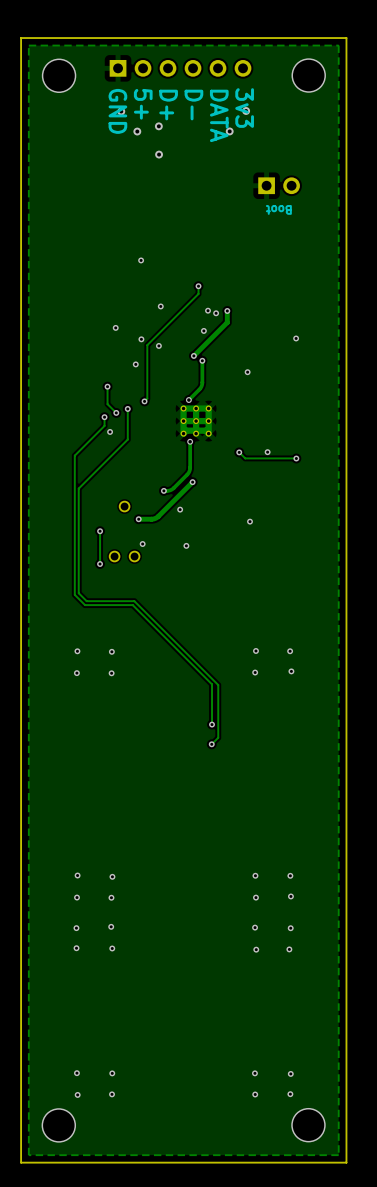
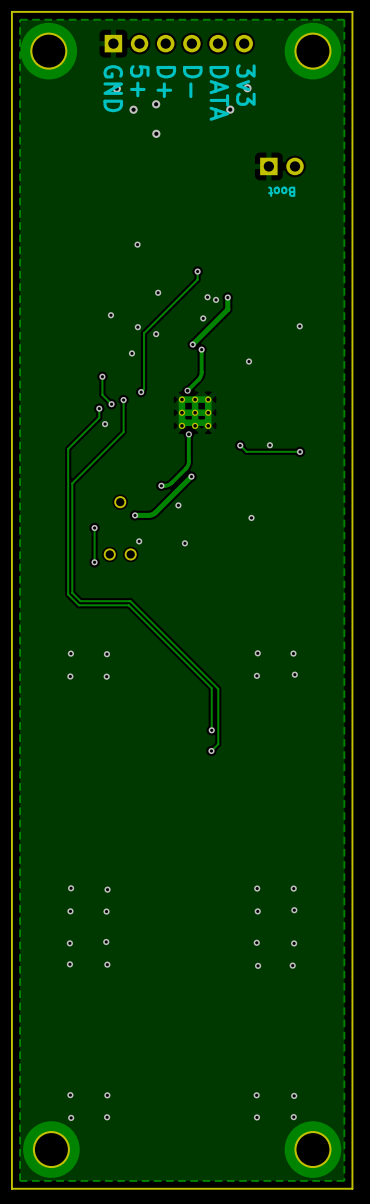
part: none -> (48, 51)
via: (59, 75) -> none
via: (308, 75) -> none
part: none -> (312, 51)
via: (58, 1125) -> none
part: none -> (51, 1149)
via: (308, 1125) -> none
part: none -> (312, 1149)

